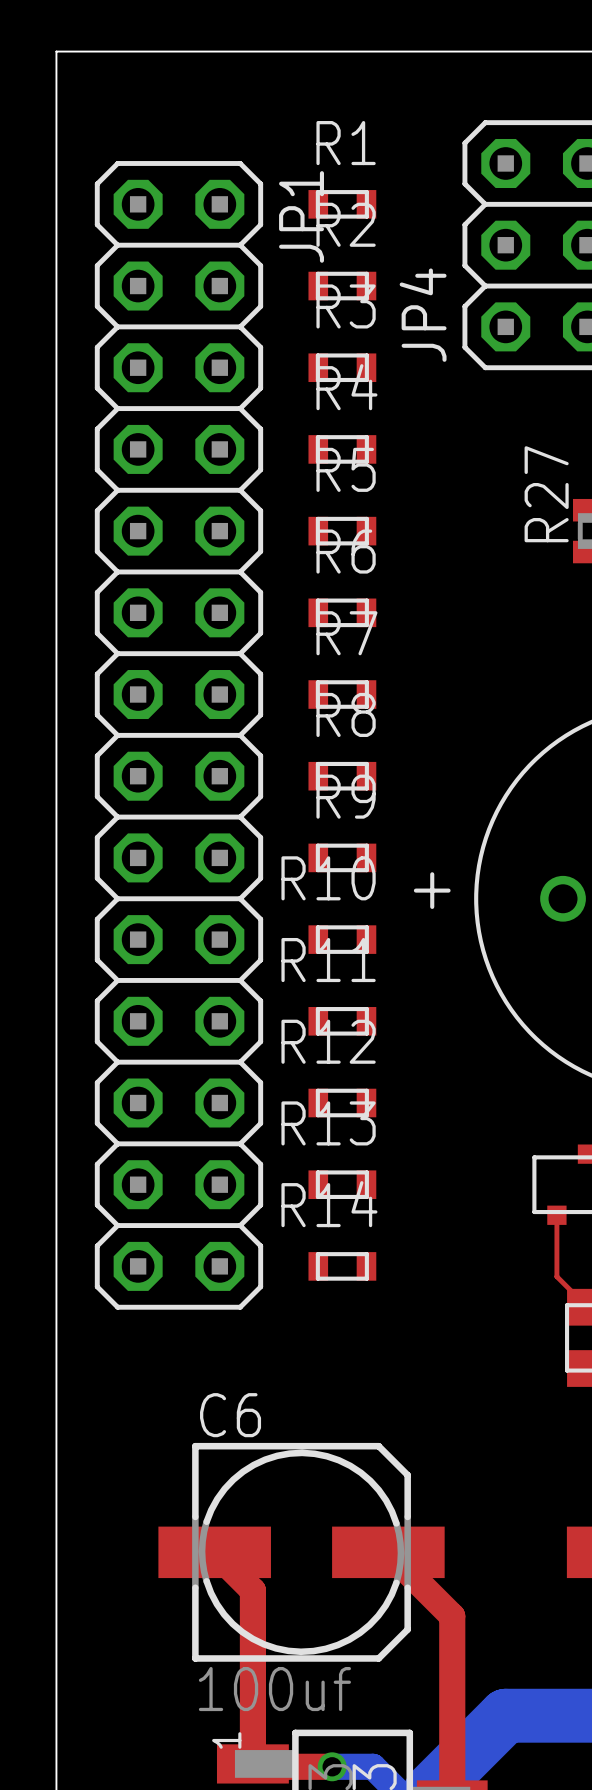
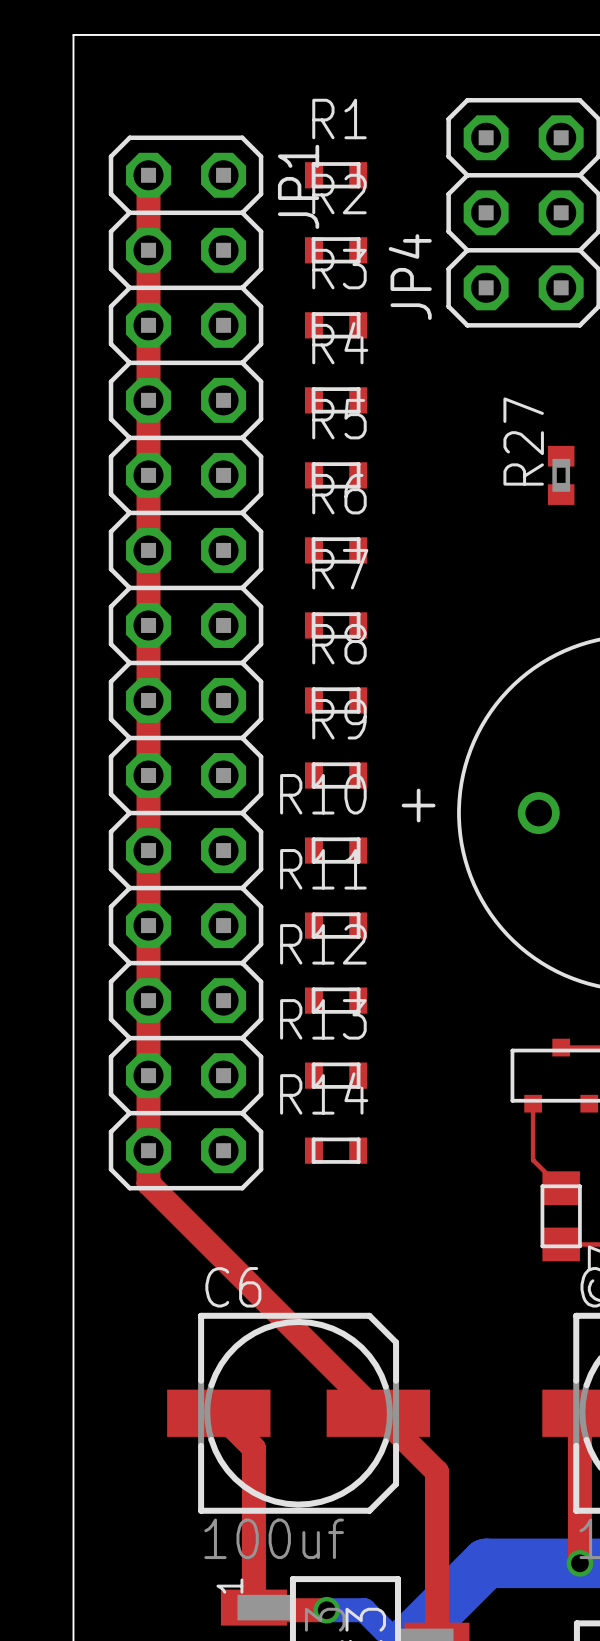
top track: none -> (148, 175) (148, 1183) (378, 1413)

